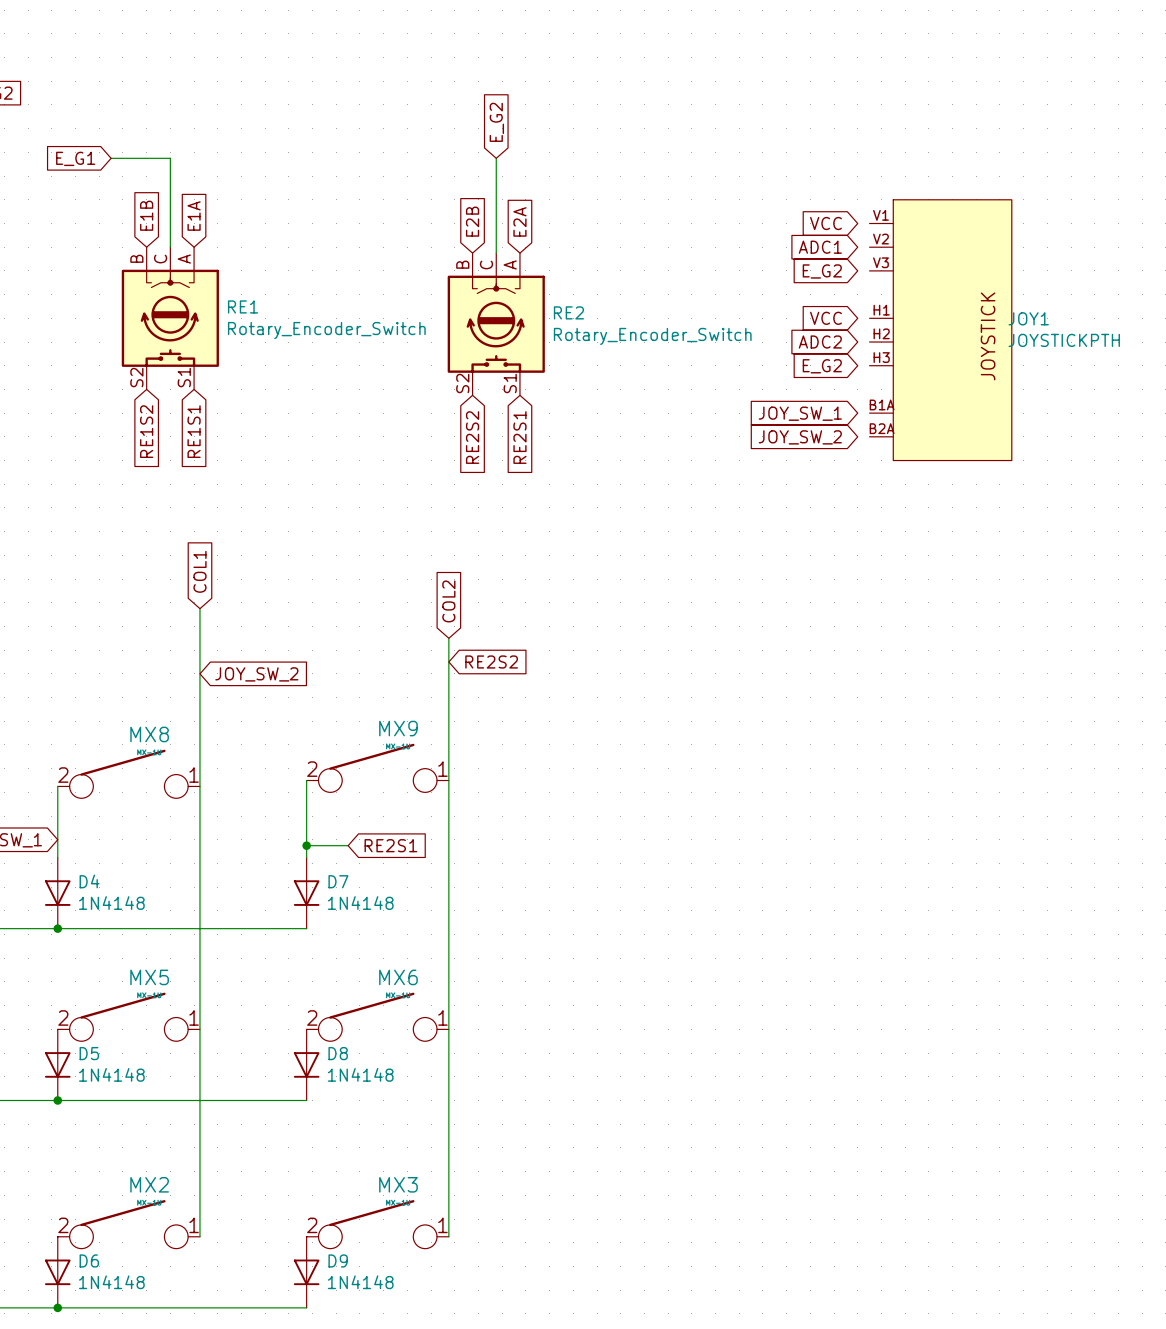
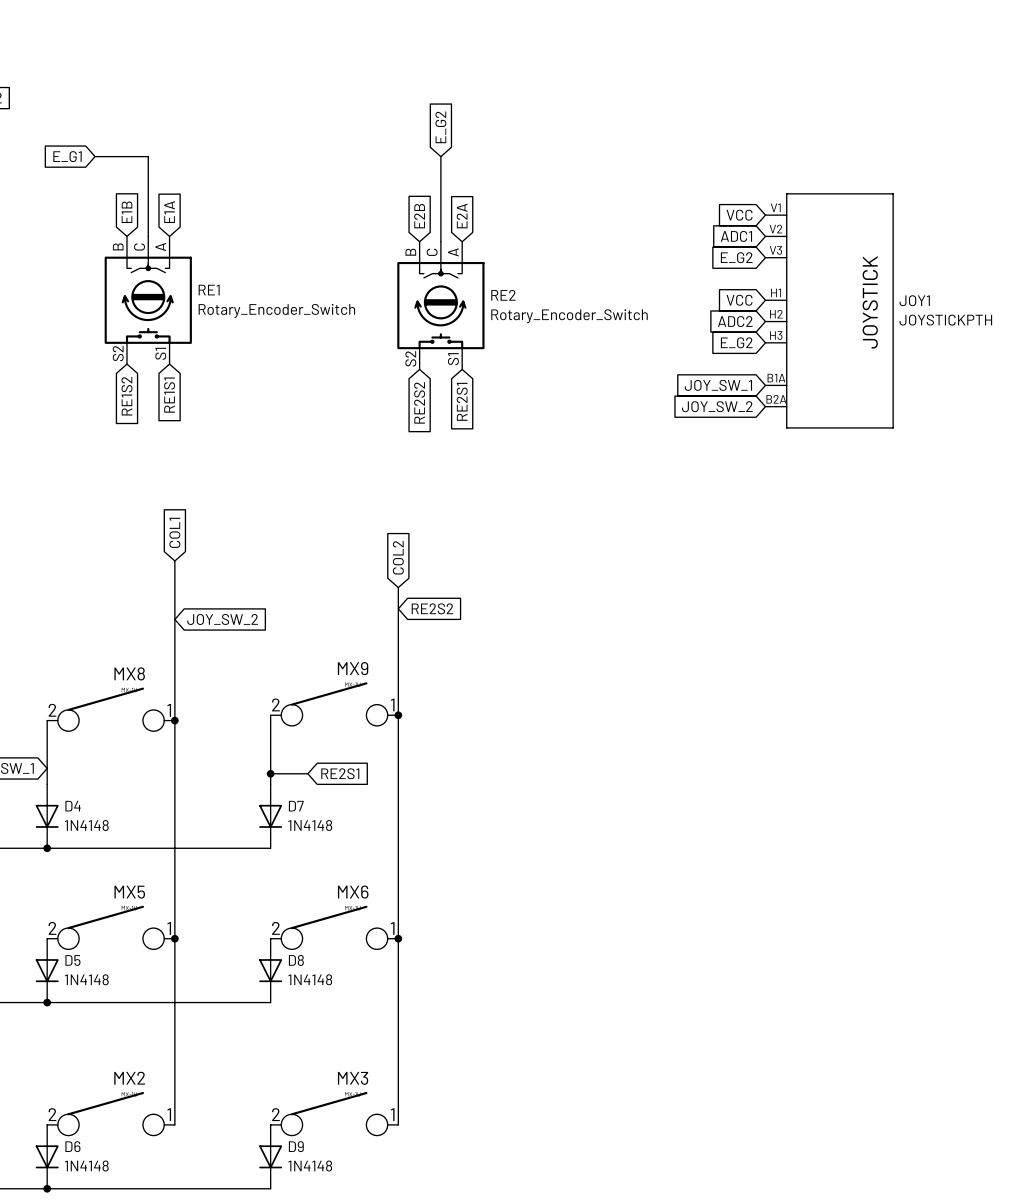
JOY1 symbol: [869, 199, 1012, 461] -> [765, 193, 894, 428]
junction: none -> (398, 715)
junction: none -> (174, 720)
junction: none -> (174, 938)
junction: none -> (398, 938)

